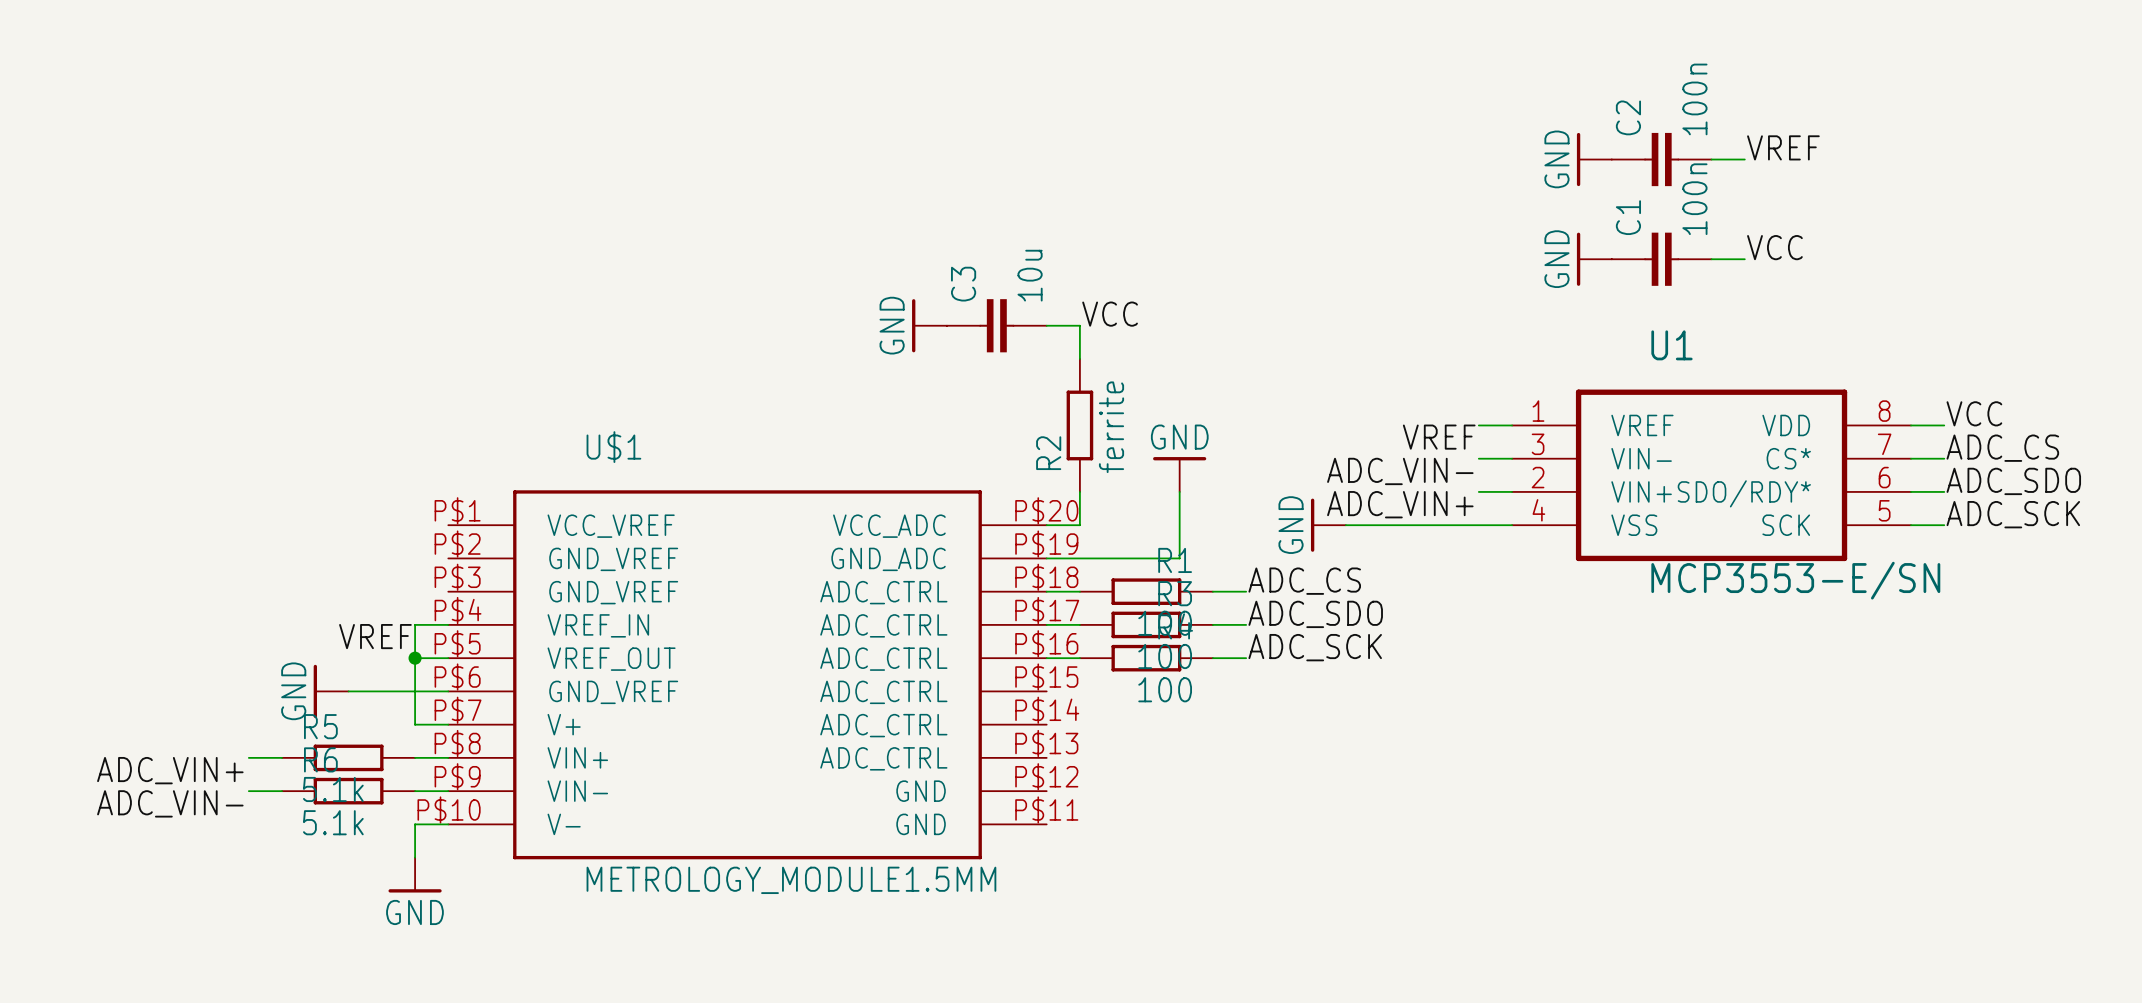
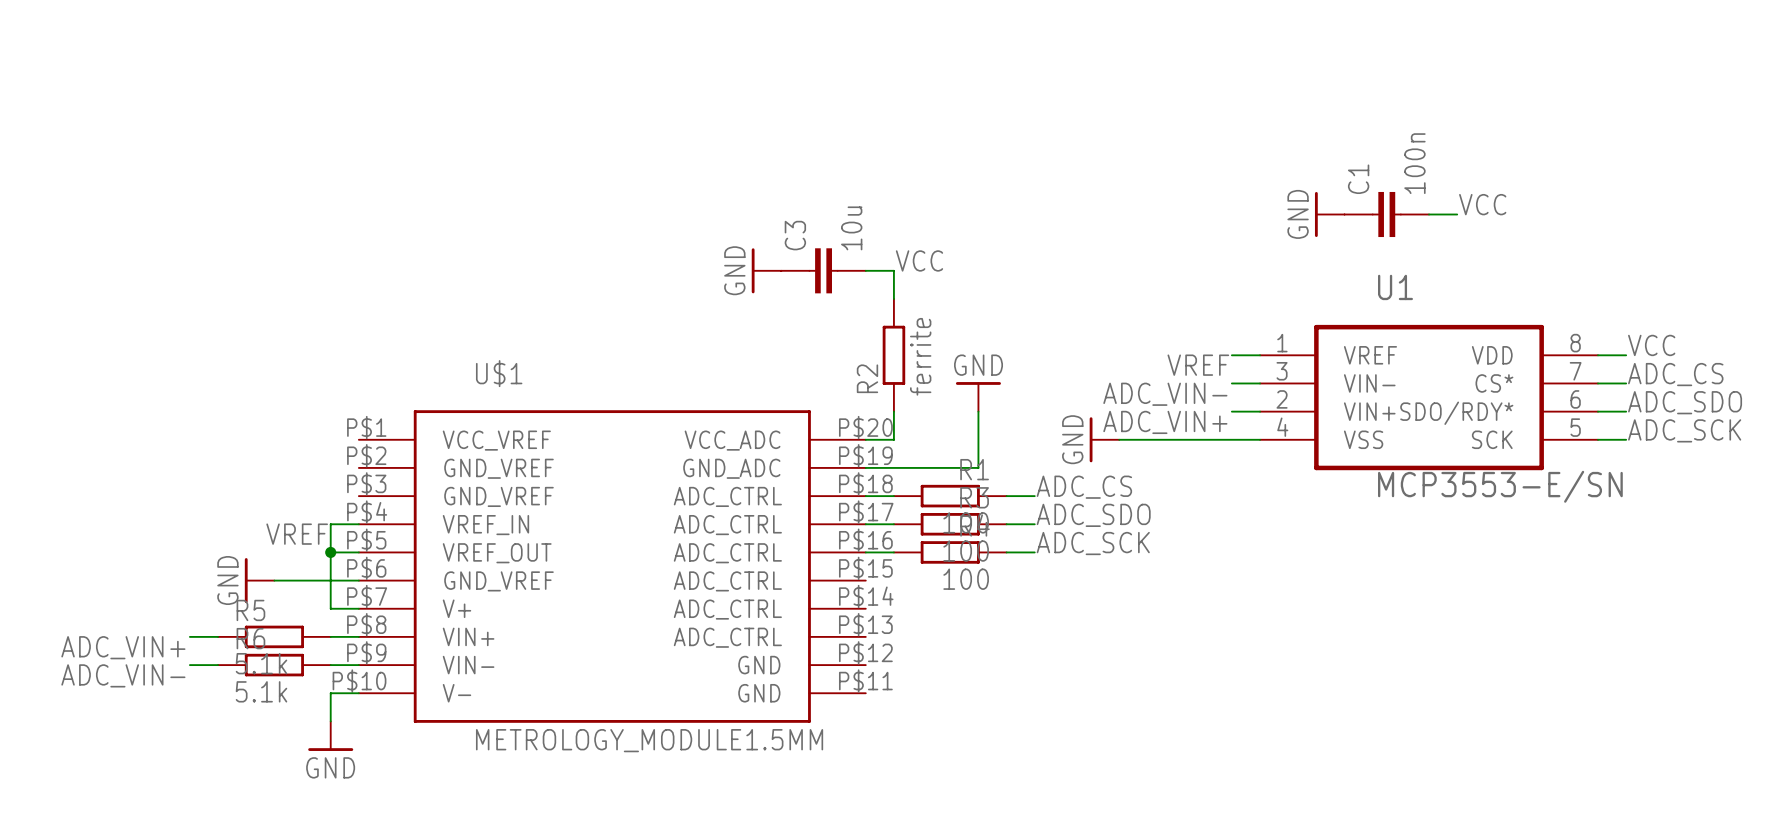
label: VREF (1783, 147) -> none
power symbol: GND (1594, 159) -> none
C2: 100n (1661, 159) -> none
wire: (1711, 159) (1744, 159) -> none

